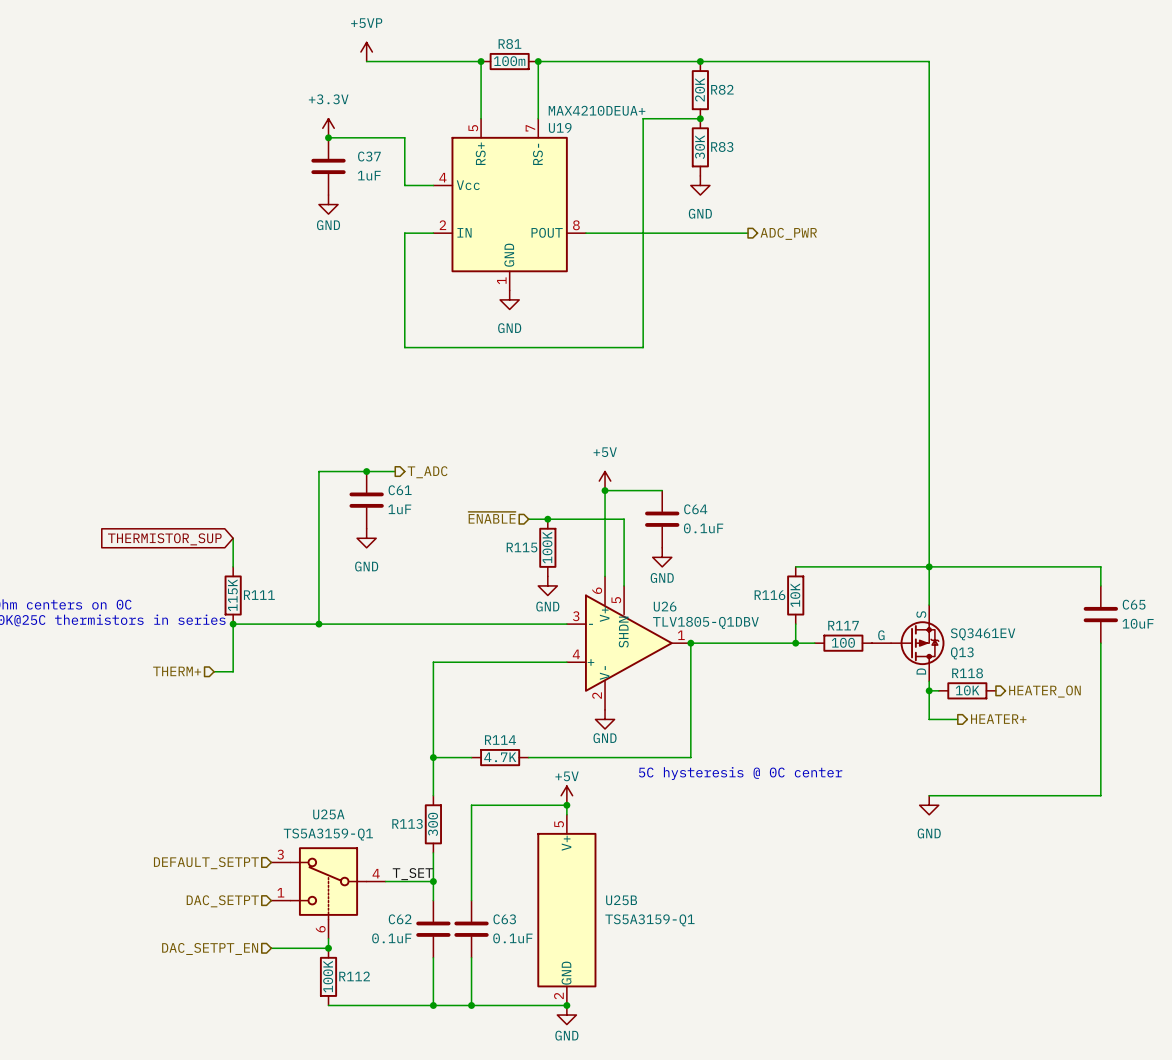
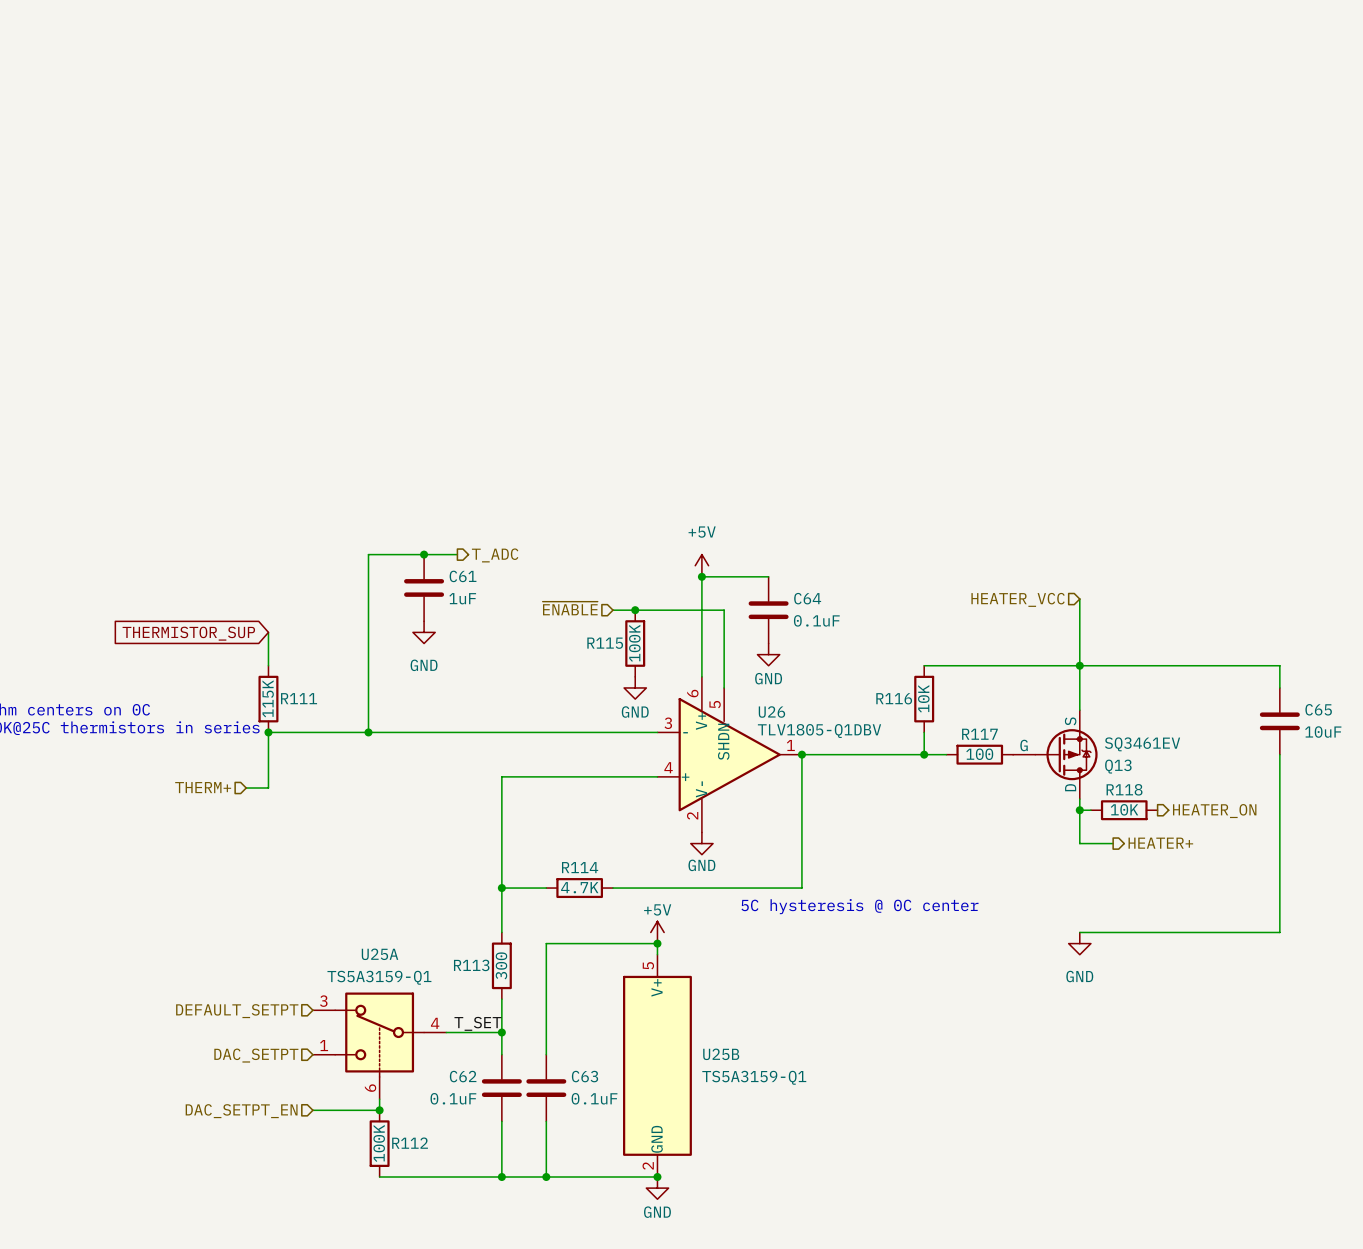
power symbol: +5VP (366, 52) -> none
wire: (366, 61) (481, 61) (481, 118) -> none
junction: (481, 61) -> none
R81: 100m (509, 61) -> none
junction: (538, 61) -> none
junction: (700, 61) -> none
R82: 20K (700, 90) -> none
wire: (538, 118) (538, 61) (929, 61) (929, 509) -> none
wire: (700, 118) (643, 118) (643, 347) (404, 347) (404, 233) (433, 233) -> none
junction: (700, 118) -> none
power symbol: +3.3V (328, 128) -> none
wire: (328, 137) (404, 137) (404, 185) (433, 185) -> none
junction: (328, 137) -> none
R83: 30K (700, 147) -> none
C37: 1uF (328, 166) -> none
power symbol: GND (700, 185) -> none
power symbol: GND (328, 204) -> none
U19: MAX4210DEUA+ (509, 204) -> none
wire: (585, 233) (748, 233) -> none
hierarchical label: ADC_PWR (788, 233) -> none
power symbol: GND (509, 299) -> none
hierarchical label: none -> HEATER_VCC (1018, 599)

